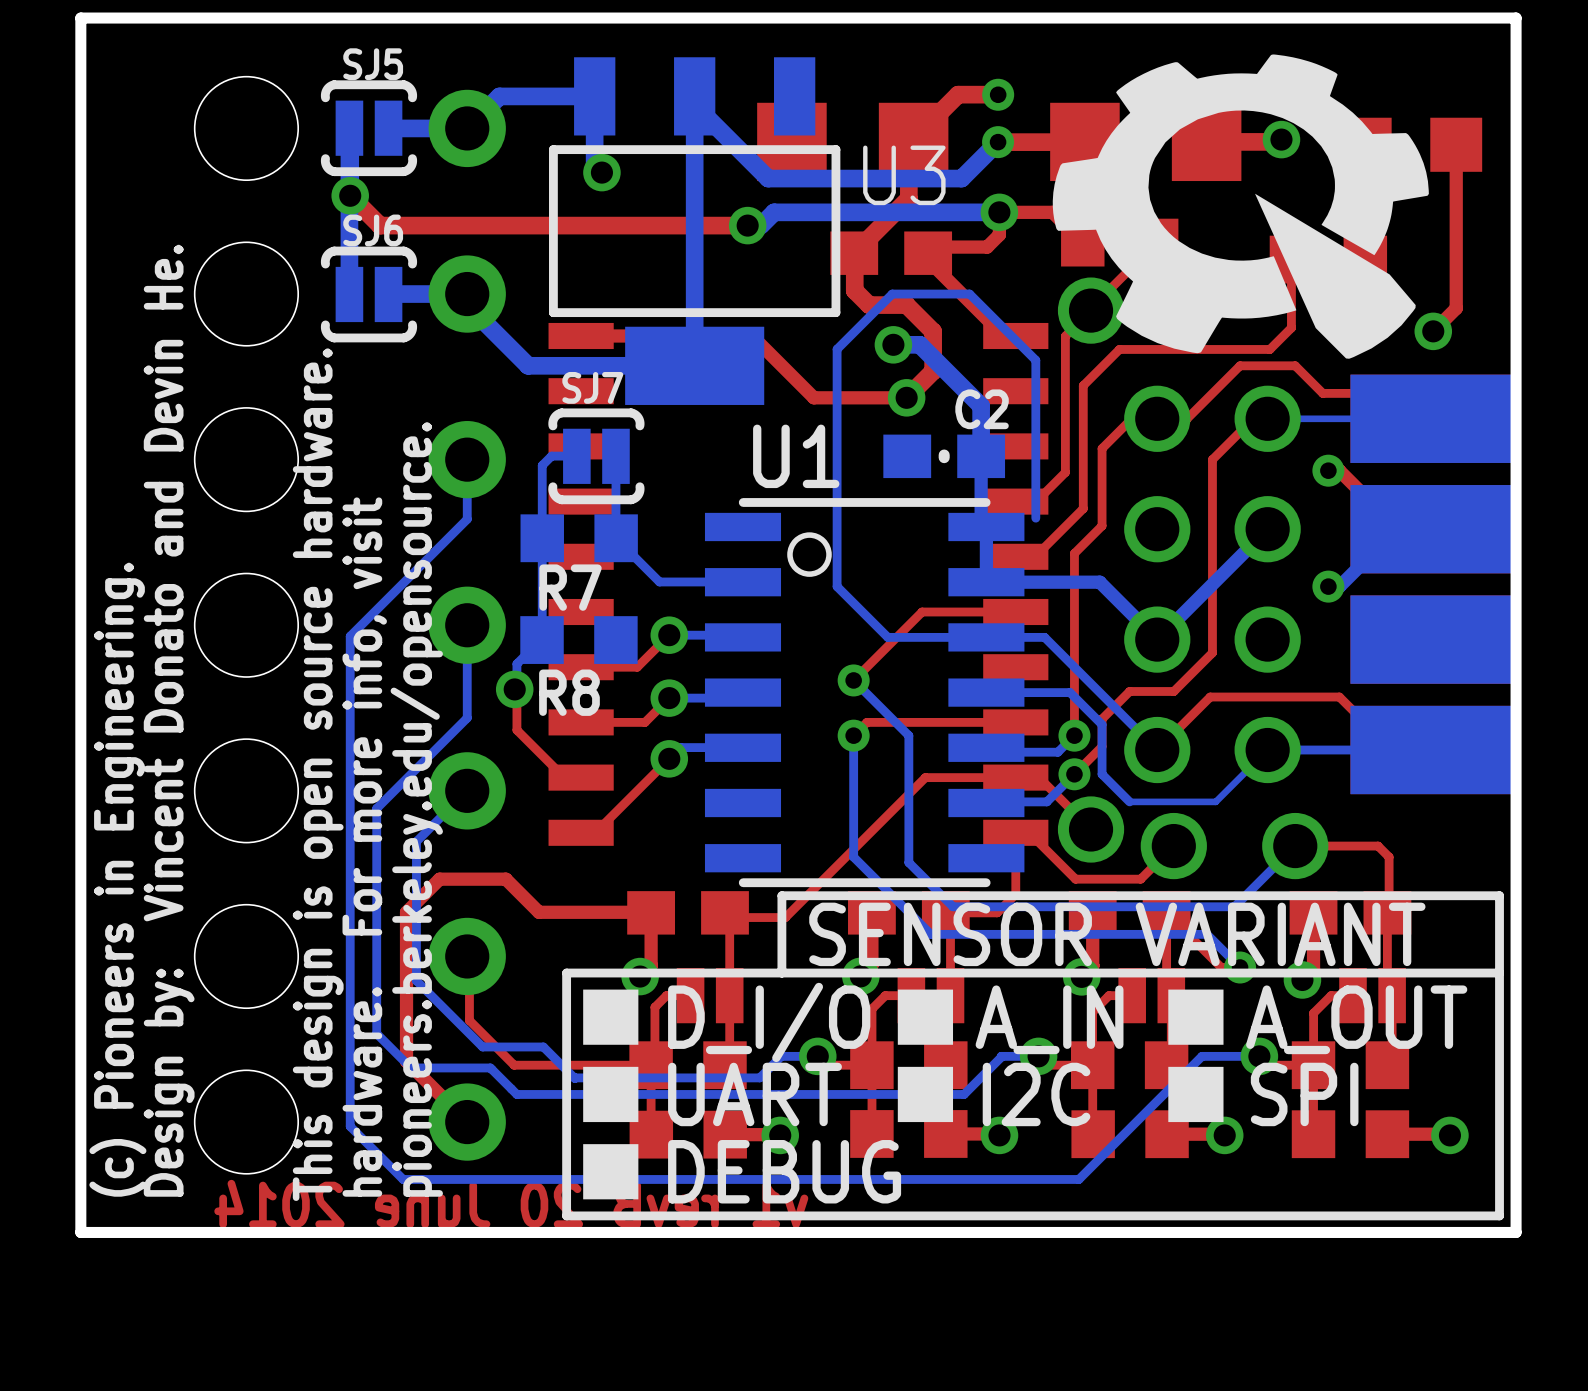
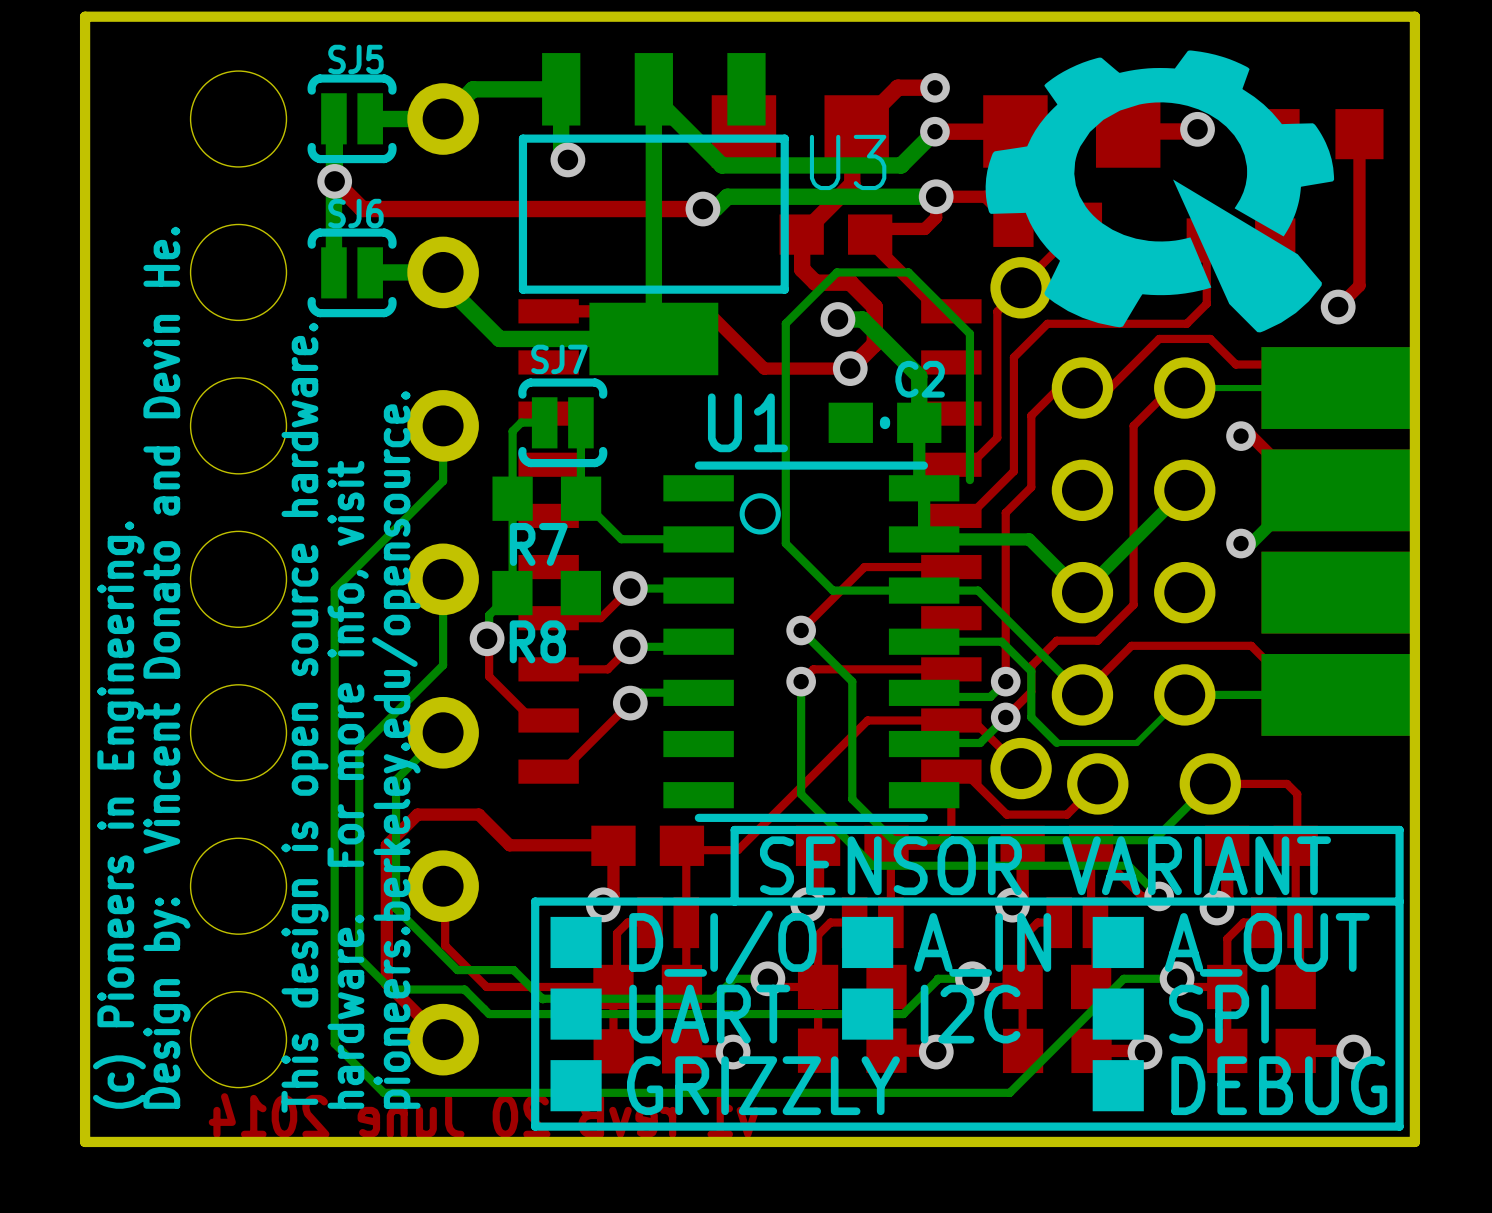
drawing: none -> [1092, 1060, 1144, 1112]
text: DEBUG (784, 1171) -> GRIZZLY (763, 1085)
text: none -> DEBUG (1279, 1085)

